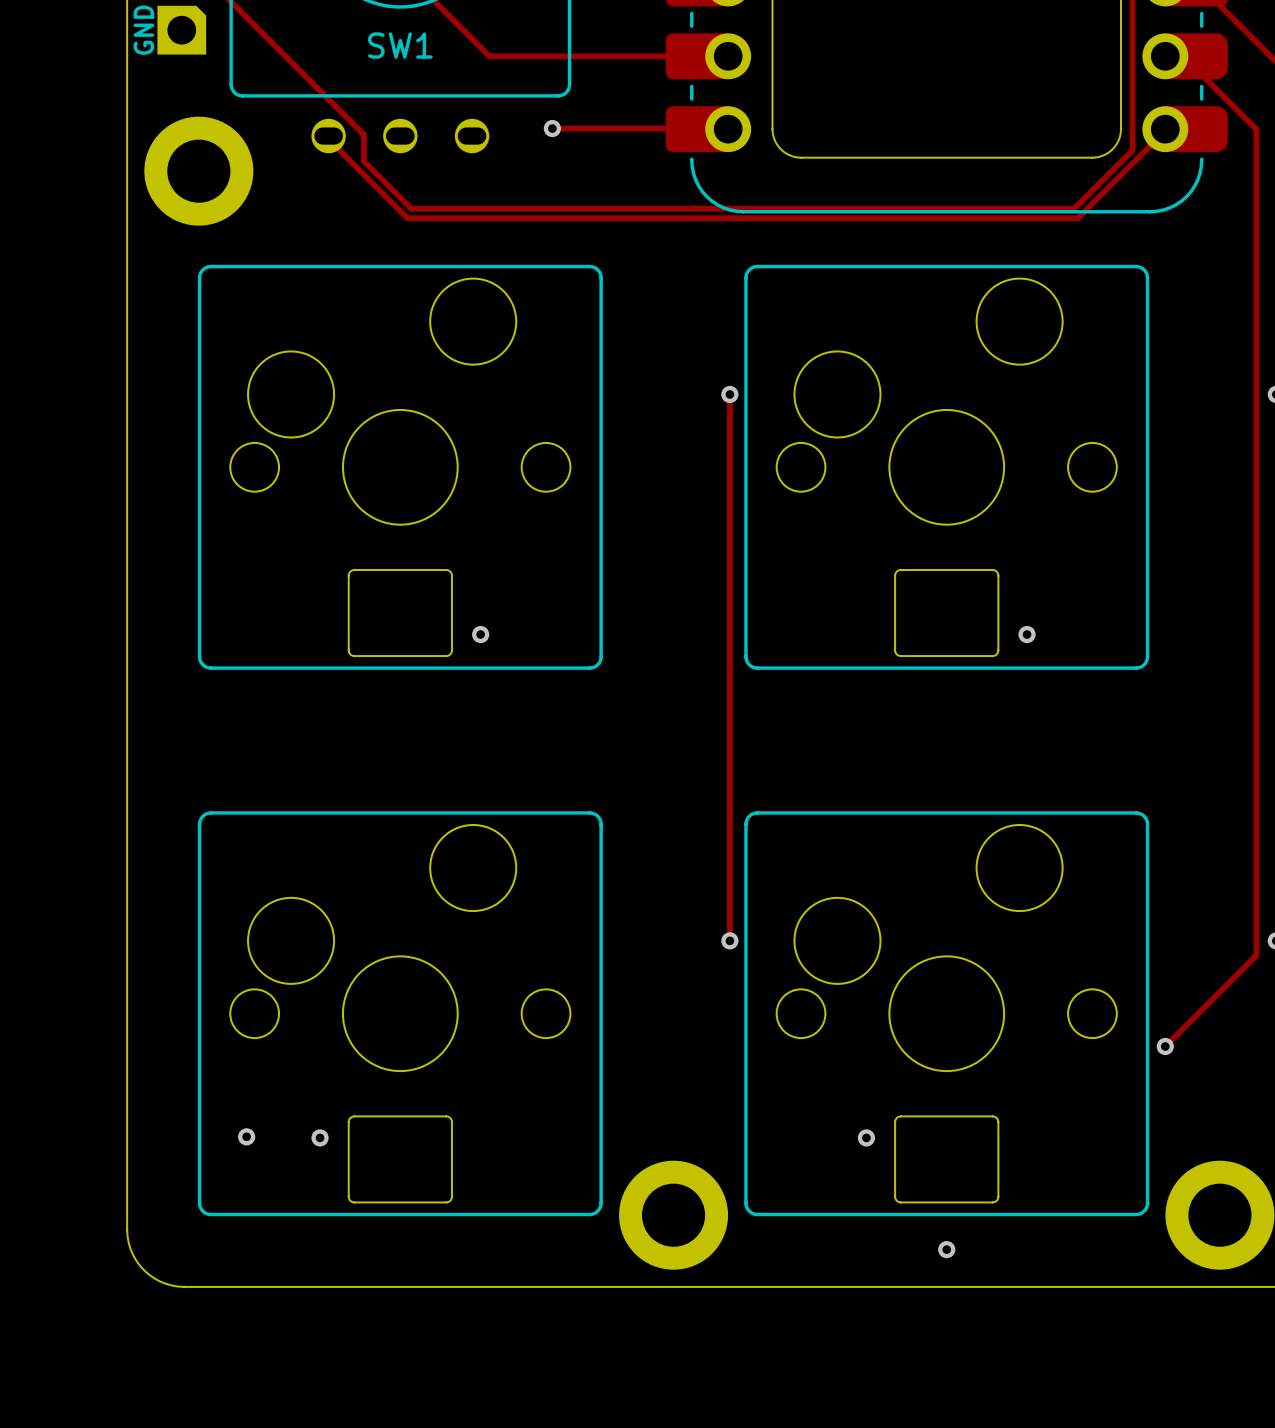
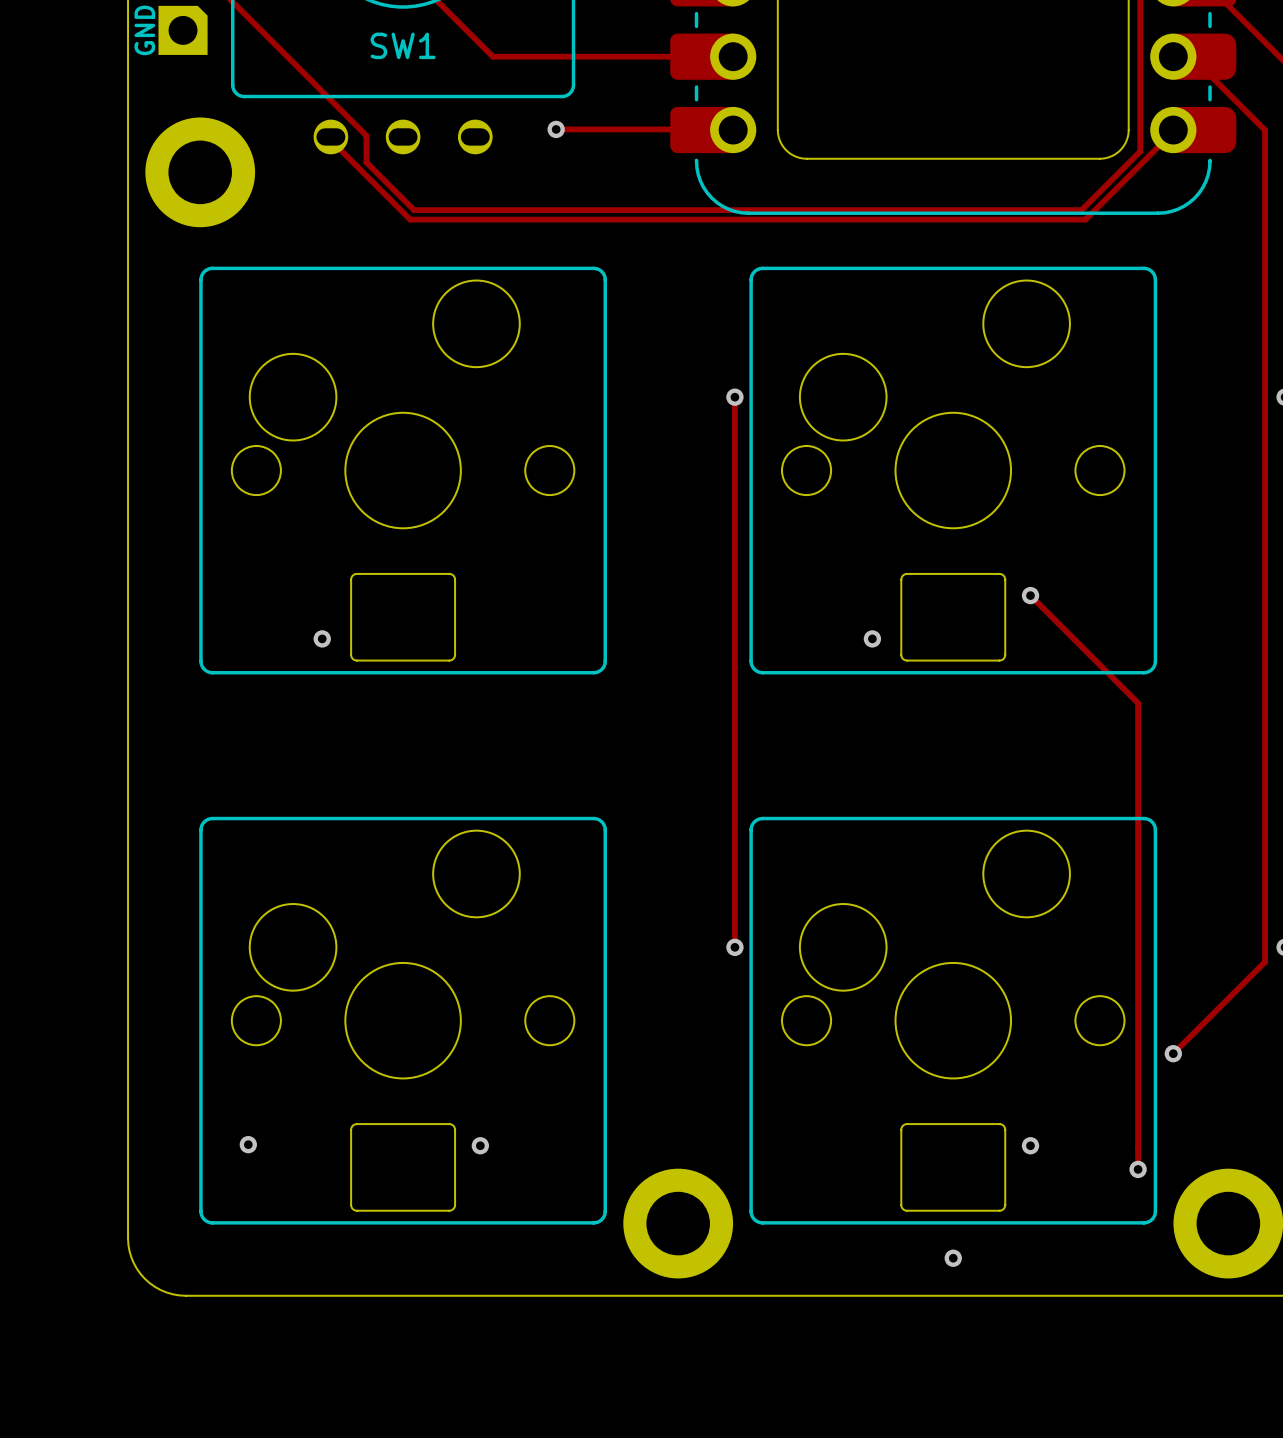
track: none -> (1030, 595) (1138, 703) (1138, 1147)
via position: (480, 634) -> (322, 638)
via: none -> (872, 638)
via position: (1027, 634) -> (1030, 595)
via position: (320, 1137) -> (480, 1145)
via: (866, 1137) -> none
via: none -> (1030, 1145)
track: none -> (1138, 1147) (1138, 1169)
via: none -> (1138, 1169)

